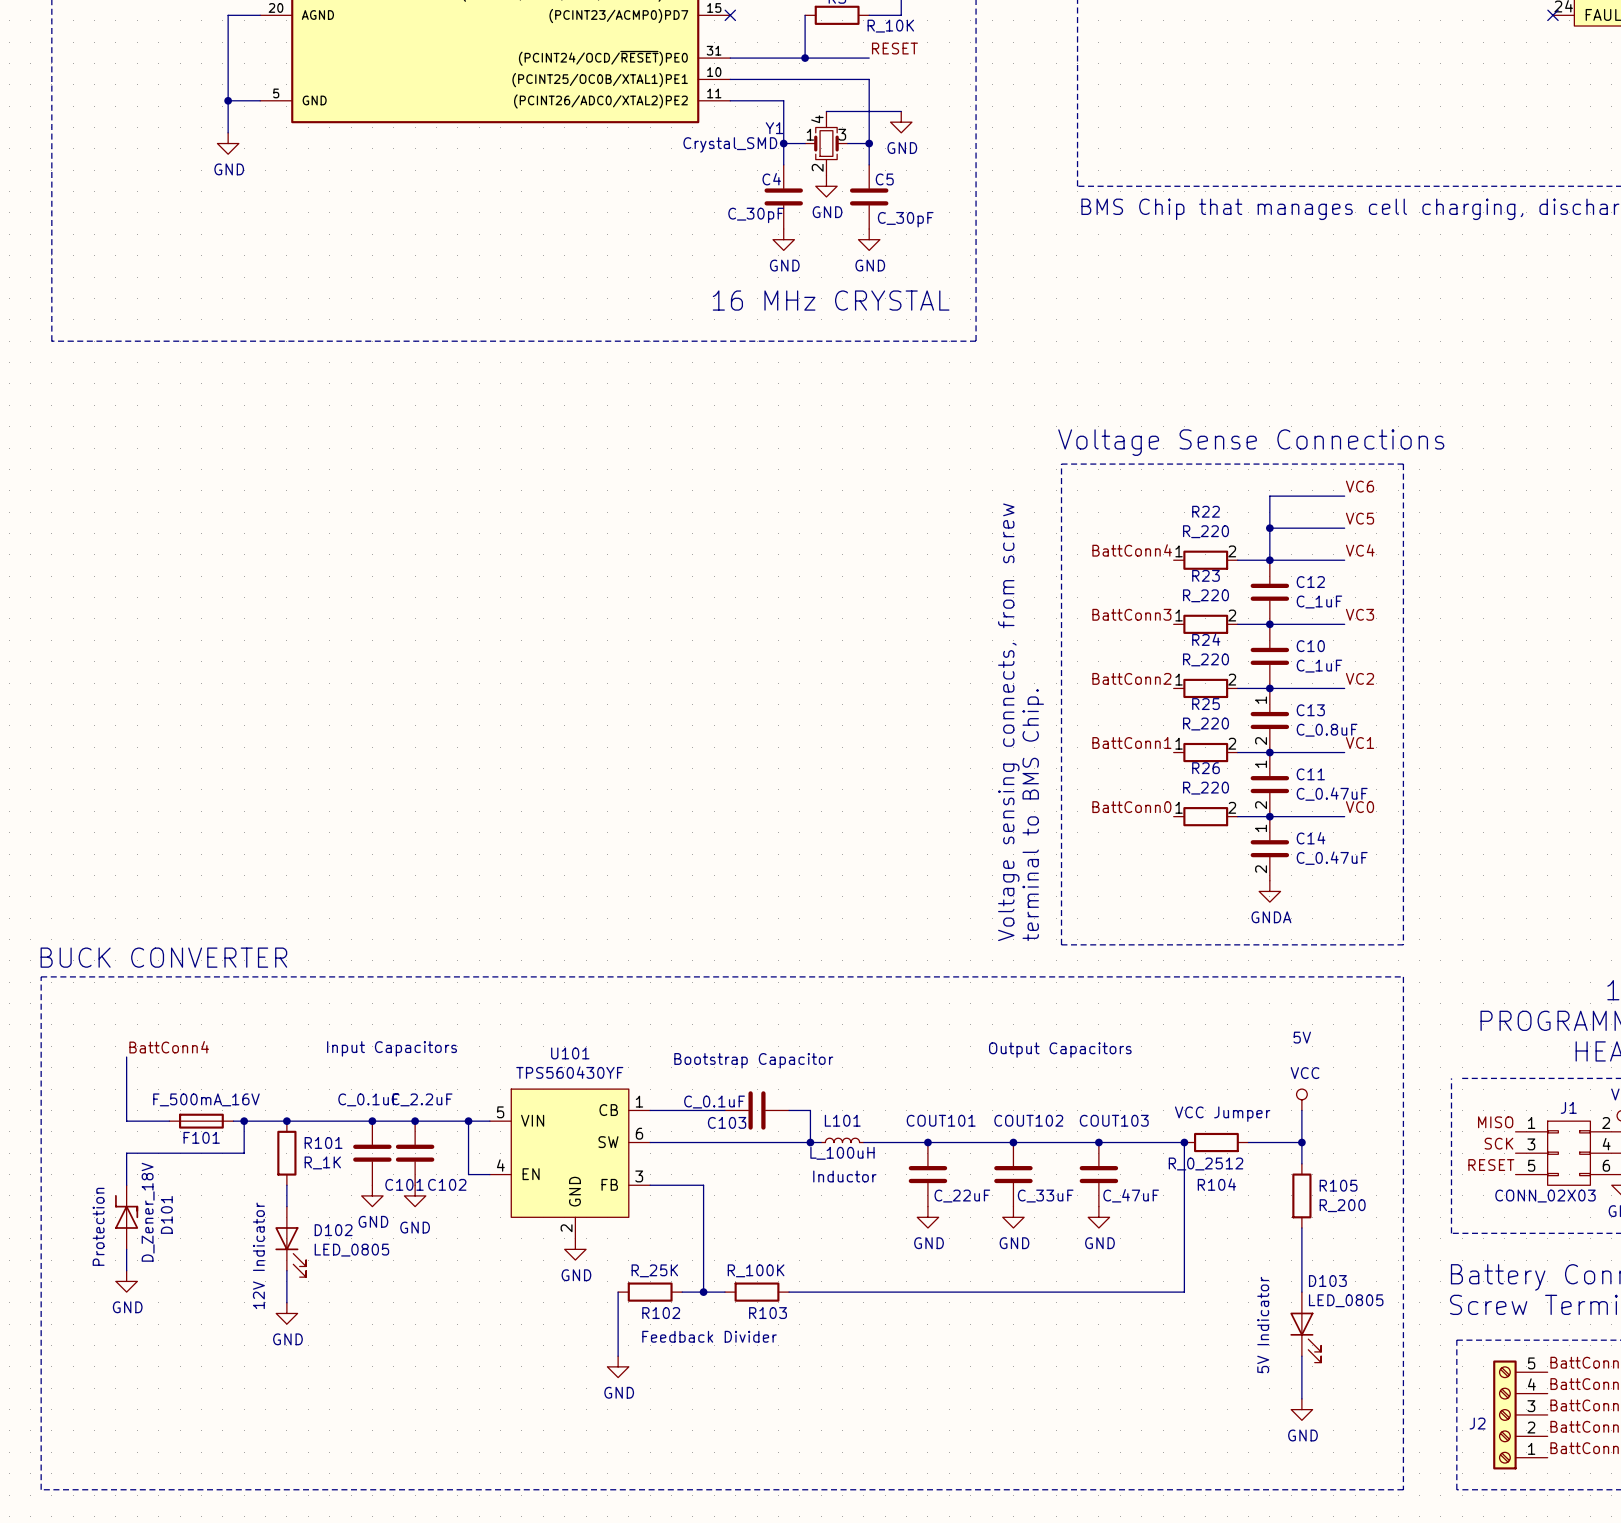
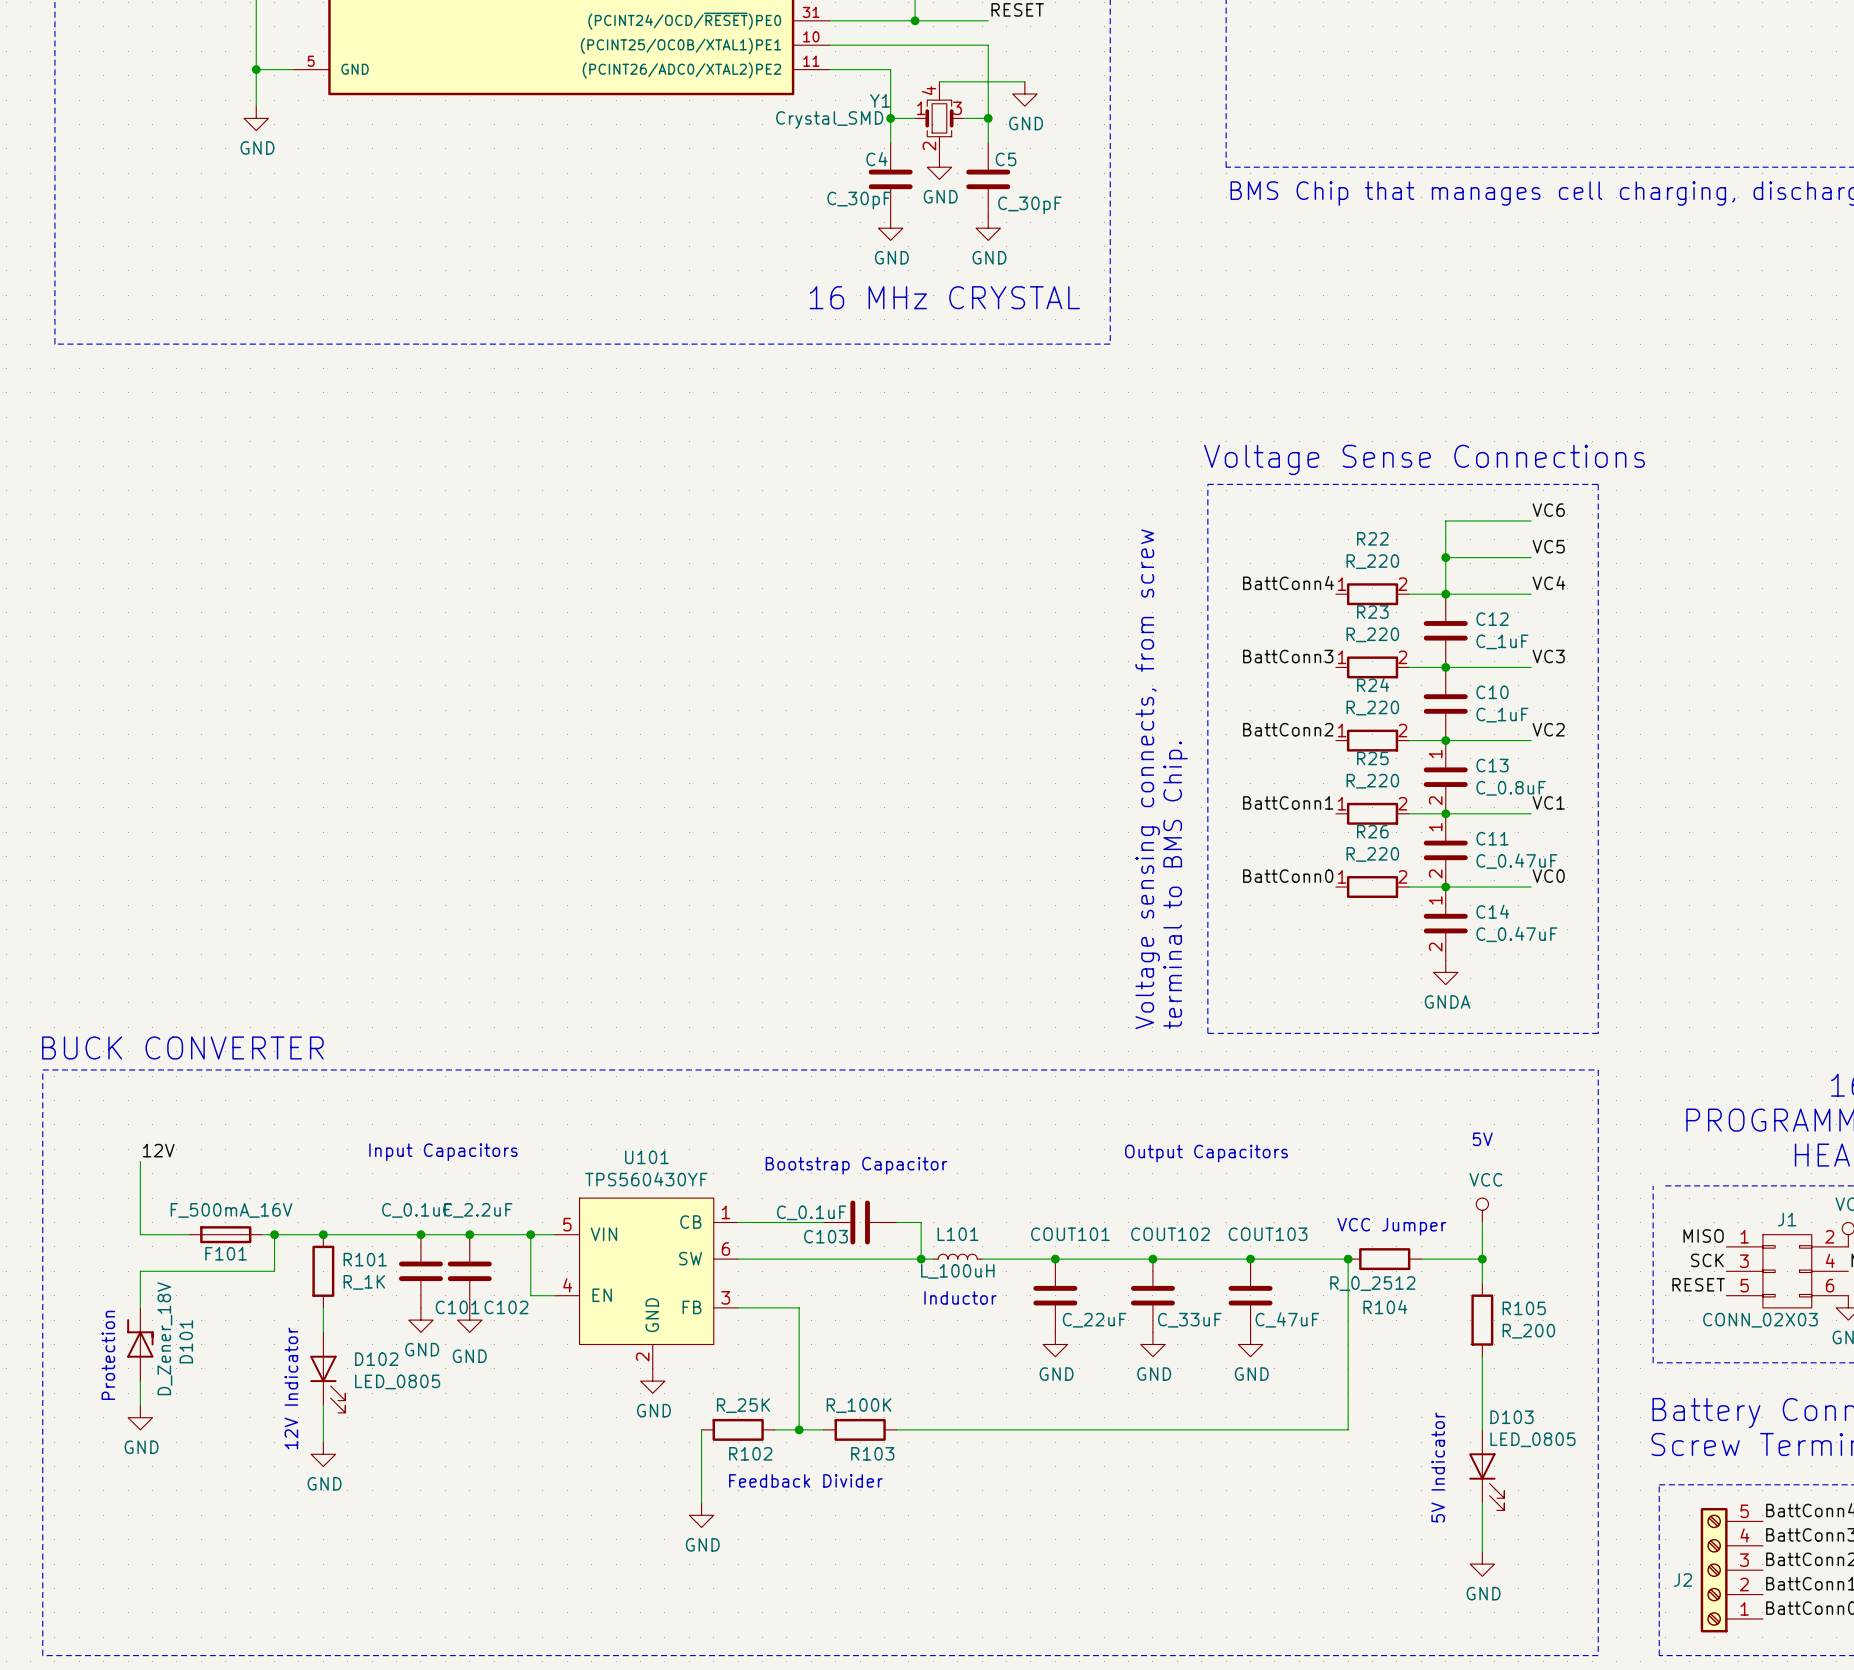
label: BattConn4 (169, 1047) -> 12V (158, 1150)

